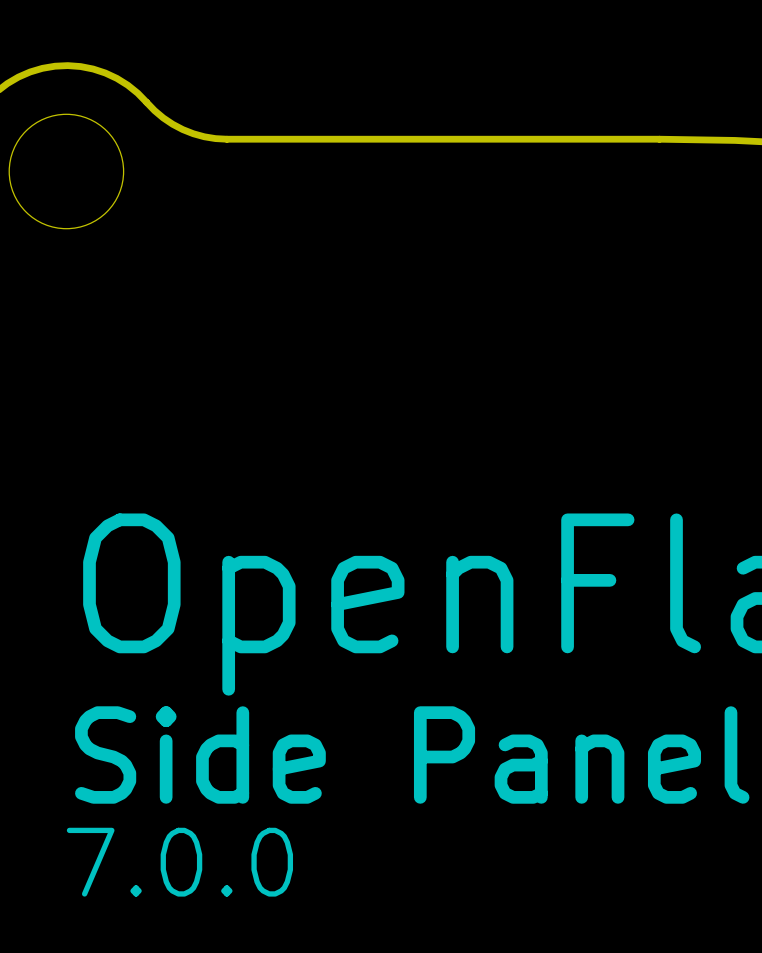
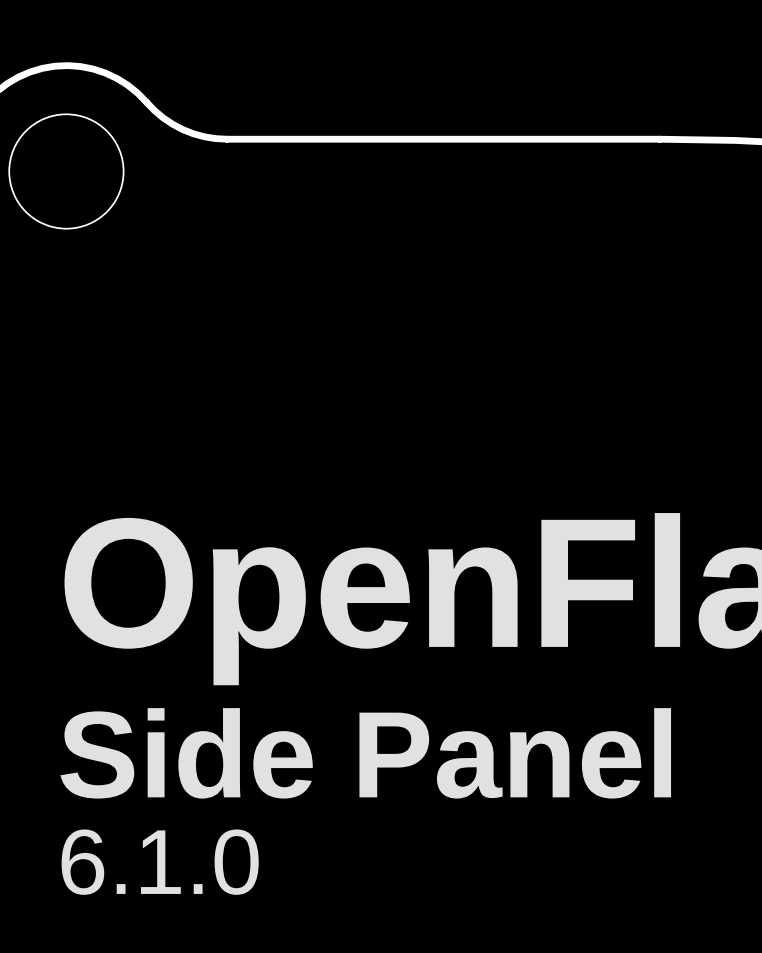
text: 7.0.0 (179, 862) -> 6.1.0 (160, 862)

